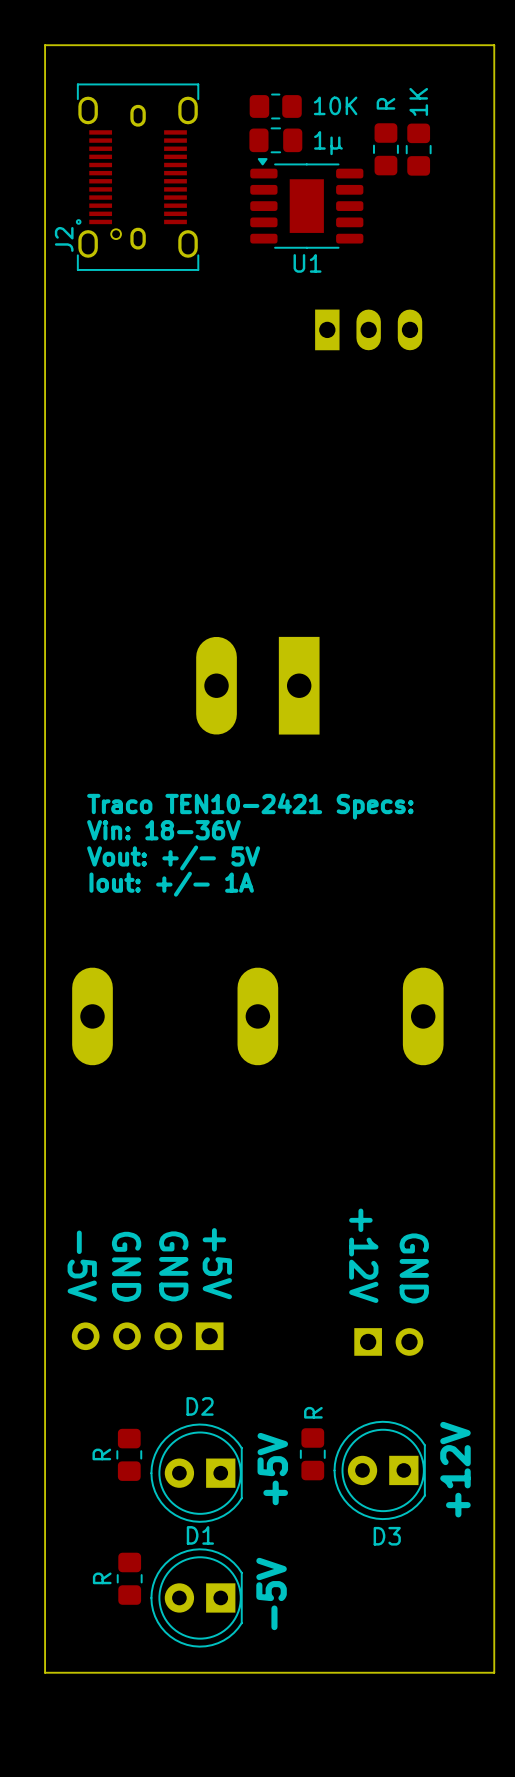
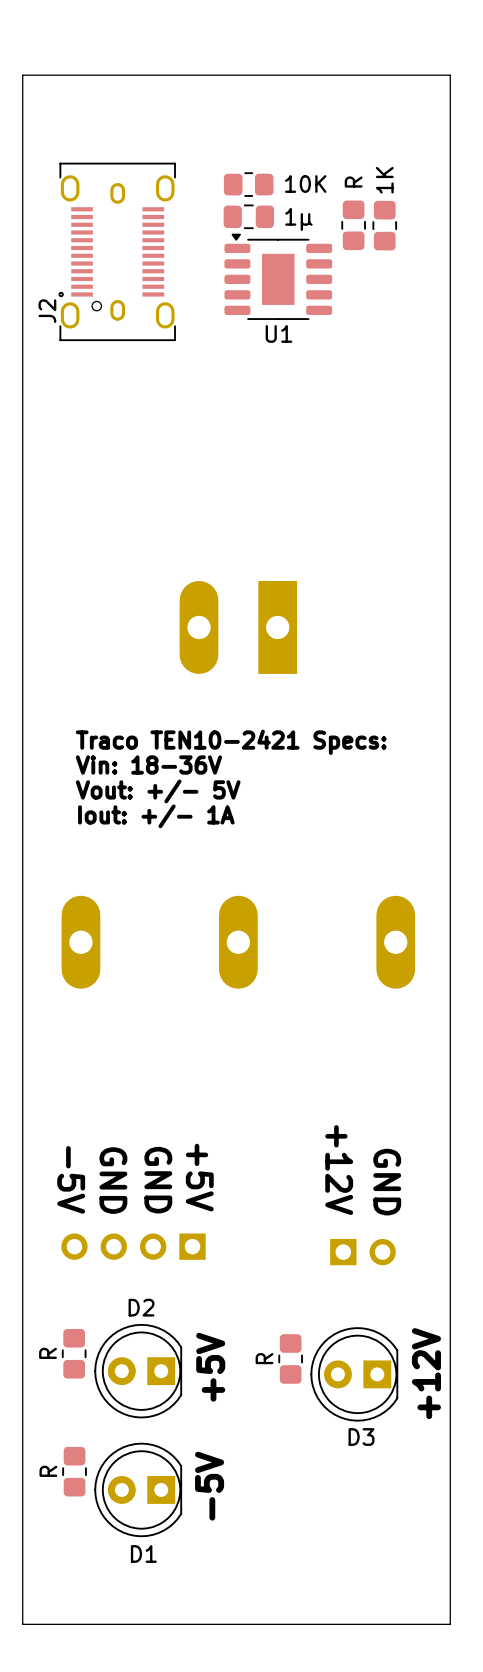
board edge: (45, 45) (494, 45) (494, 1672) (45, 1672) (45, 45) -> (22, 75) (450, 75) (450, 1624) (22, 1624) (22, 75)
part position: (275, 106) -> (248, 184)
part position: (275, 140) -> (248, 216)
part position: (385, 149) -> (353, 225)
part position: (418, 149) -> (384, 225)
J2 position: (137, 177) -> (117, 251)
U1 position: (306, 203) -> (278, 276)
part: (368, 329) -> none
part value position: R (313, 1412) -> R (264, 1358)
D2 footprint: [150, 1423, 243, 1523] -> [94, 1323, 183, 1419]
part position: (129, 1454) -> (74, 1353)
text position: +5V (272, 1469) -> +5V (210, 1367)
D1 name position: D1 (200, 1535) -> D1 (143, 1553)
part position: (129, 1578) -> (74, 1471)
text position: -5V (271, 1593) -> -5V (209, 1486)
D1 position: (196, 1597) -> (138, 1489)

